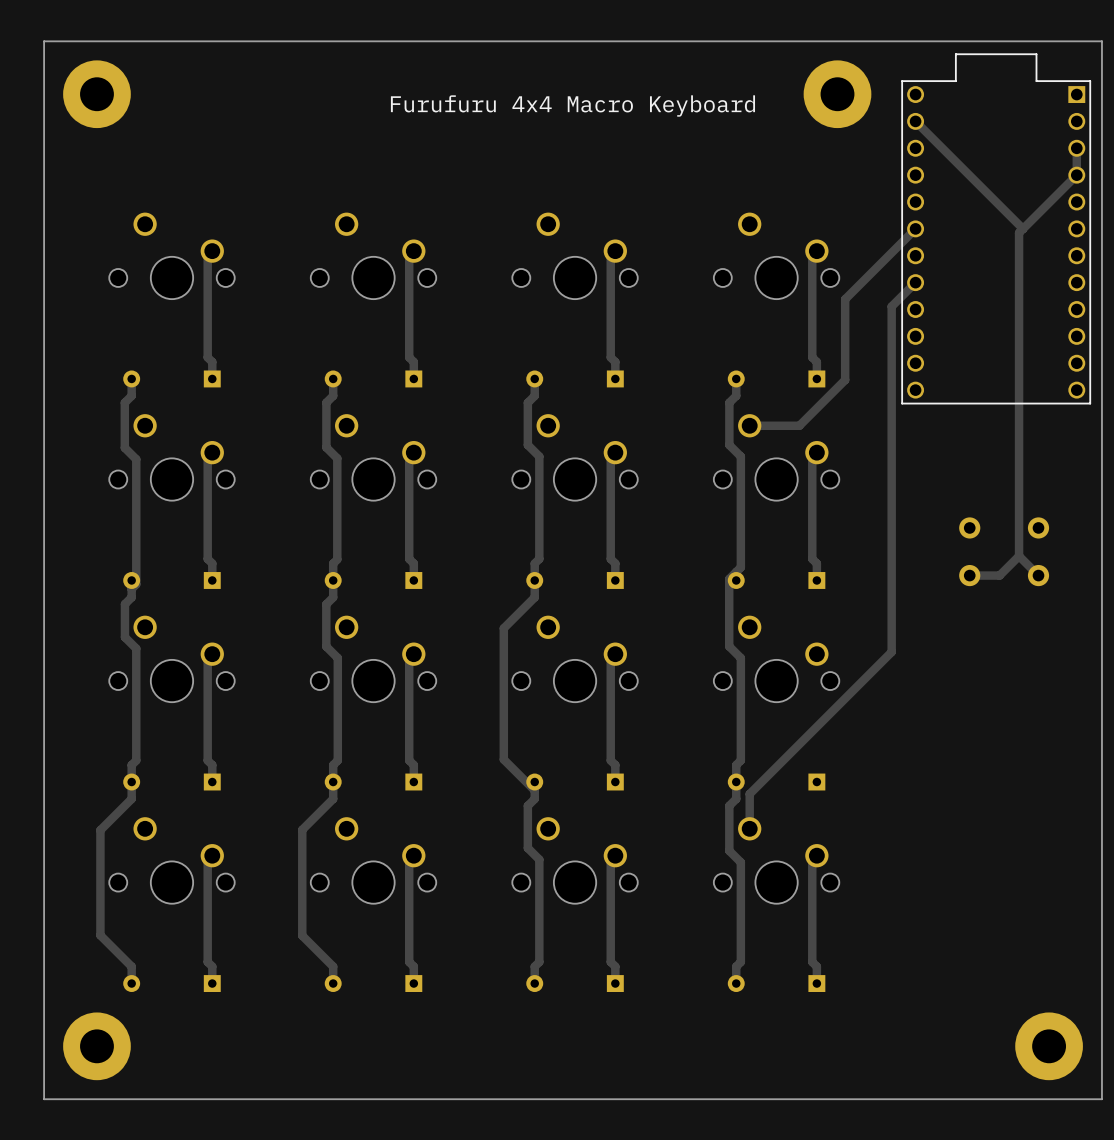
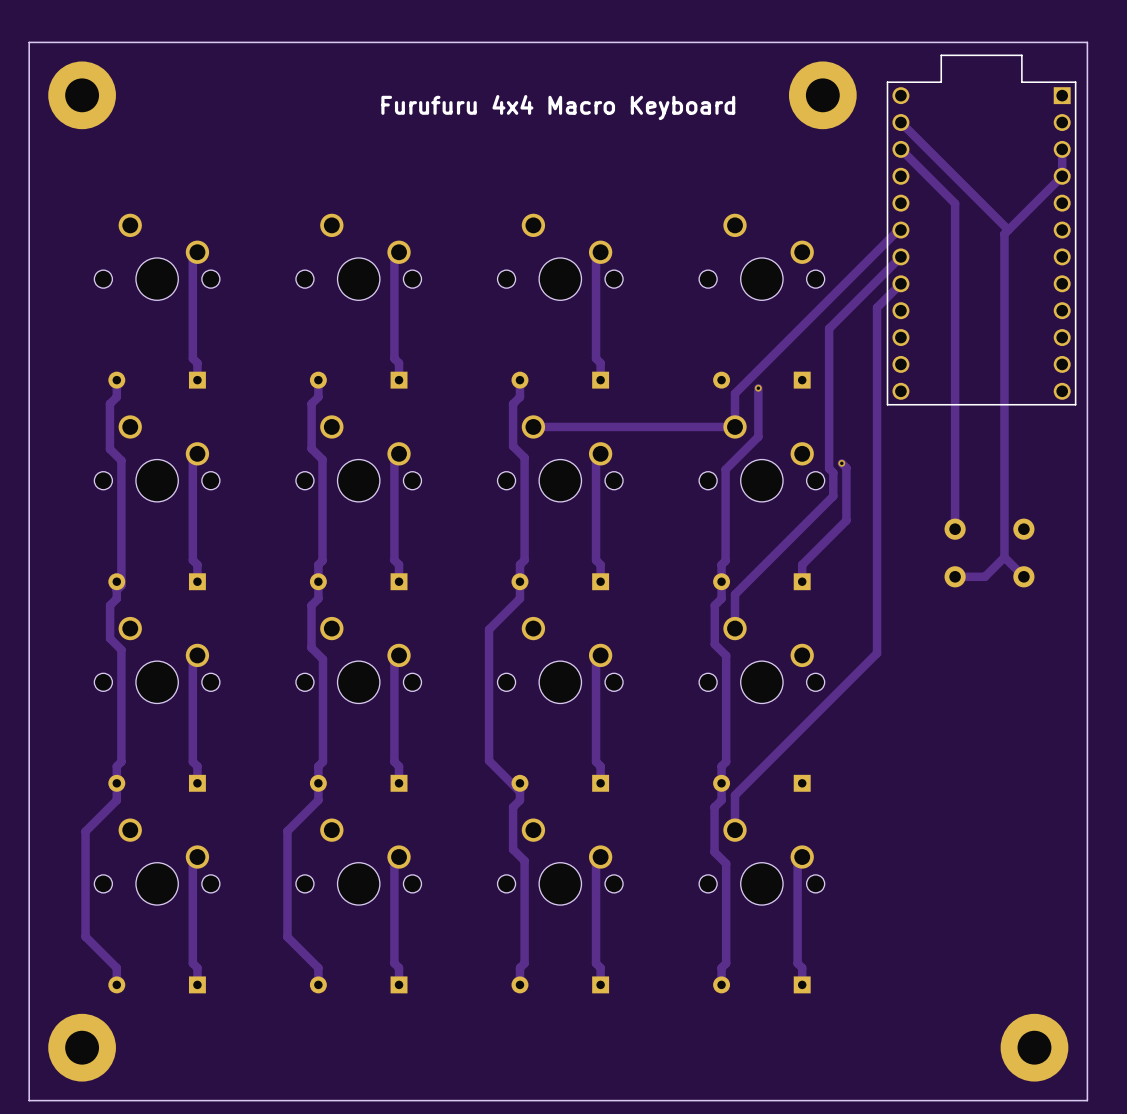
track: none -> (900, 149) (955, 203) (955, 529)
track: (915, 228) (845, 299) (845, 380) (799, 425) (749, 425) -> (900, 230) (898, 230) (735, 393) (735, 426) (533, 426)
track: (816, 251) (812, 255) (812, 357) (816, 362) (816, 378) -> none
track: none -> (900, 256) (829, 328) (829, 468) (833, 472) (833, 496) (735, 594) (735, 628)
track: (736, 378) (736, 395) (729, 402) (729, 445) (740, 456) (740, 567) (729, 579) (729, 646) (740, 658) -> (721, 581) (721, 598) (714, 605) (714, 644) (726, 655) (726, 659)
track: none -> (758, 388) (758, 436) (725, 469) (725, 560) (721, 564) (721, 573)
via: none -> (758, 388)
track: (816, 452) (812, 457) (812, 558) (816, 563) -> (841, 463) (846, 467) (846, 520) (802, 564)
via: none -> (841, 463)

